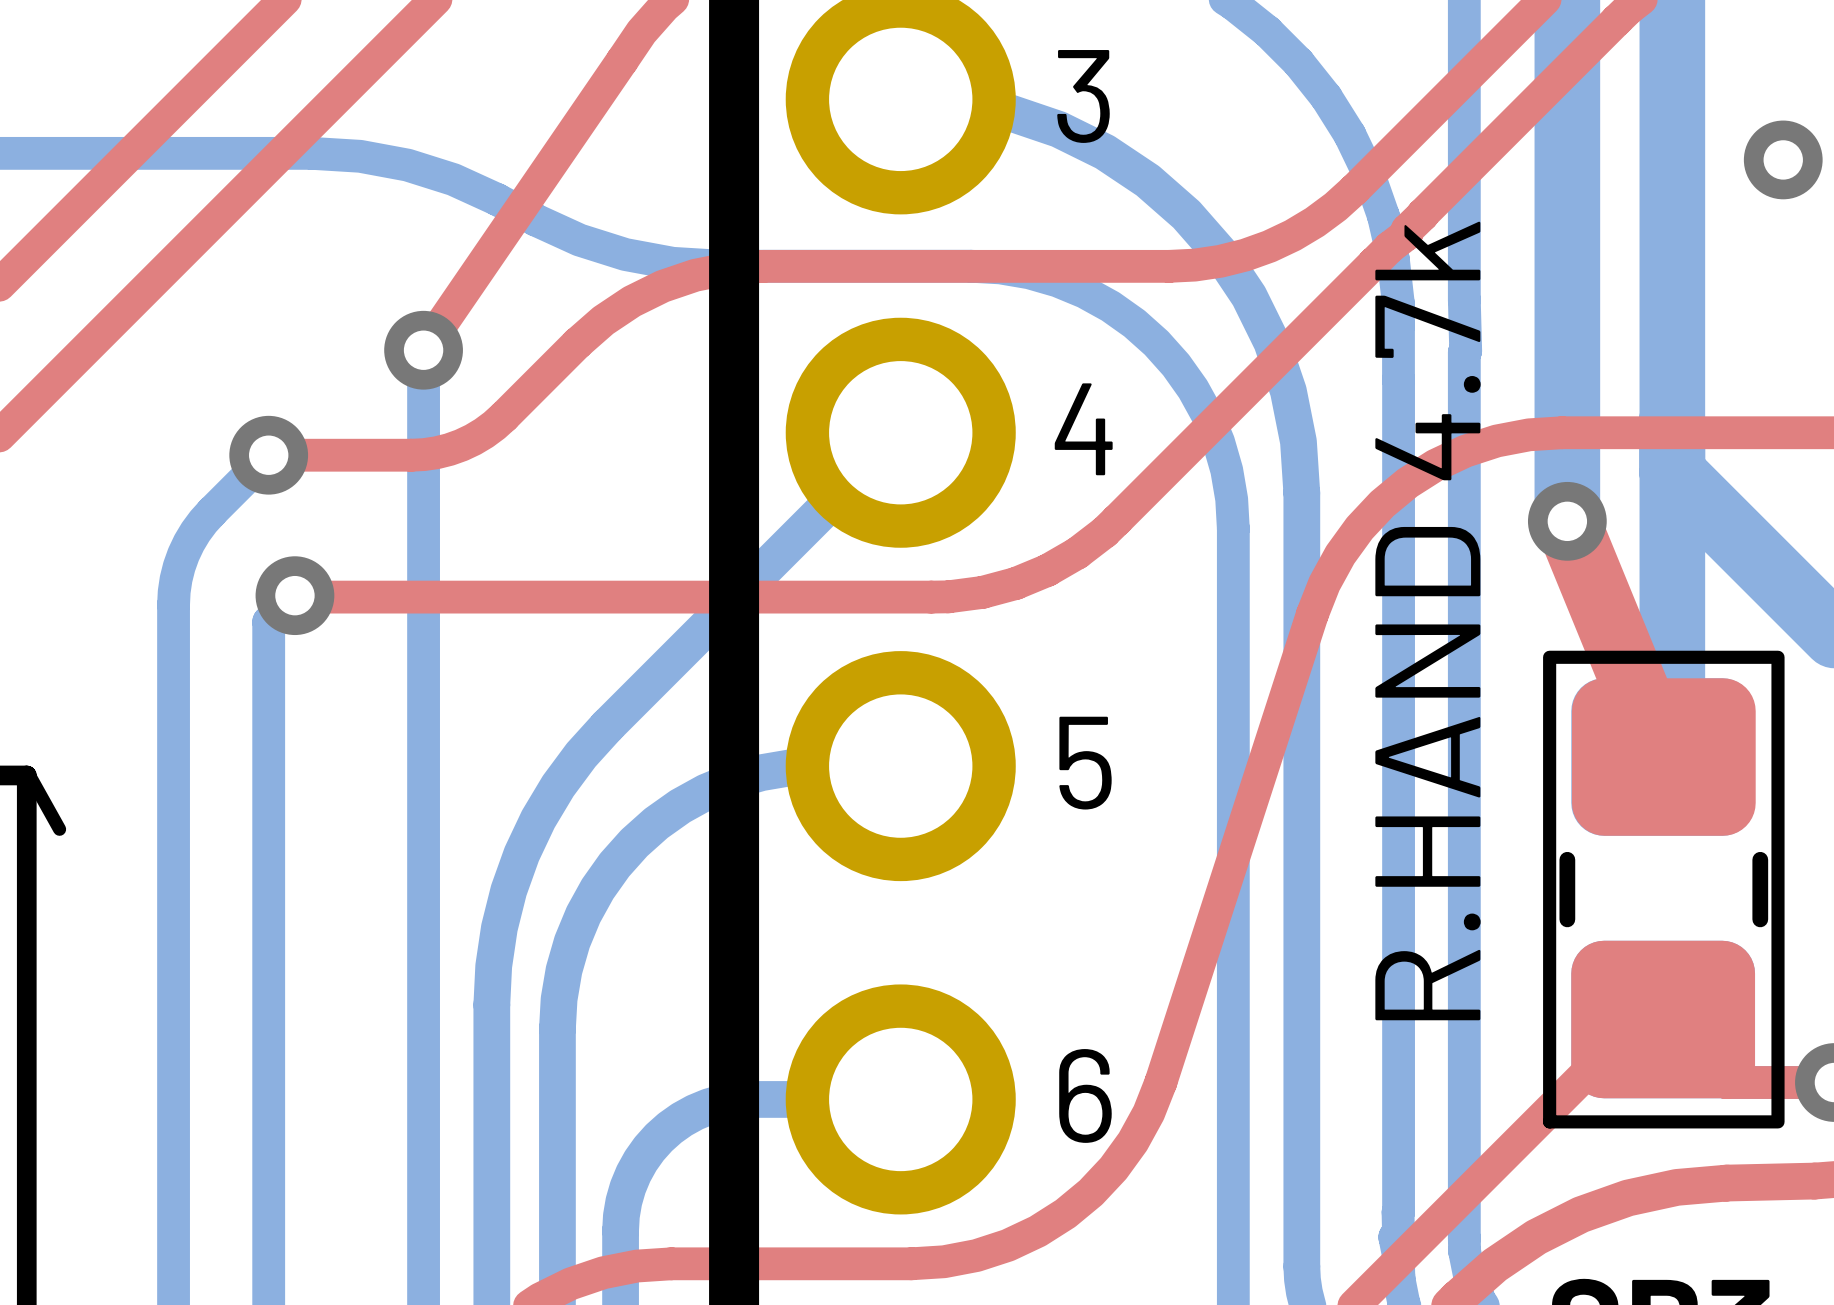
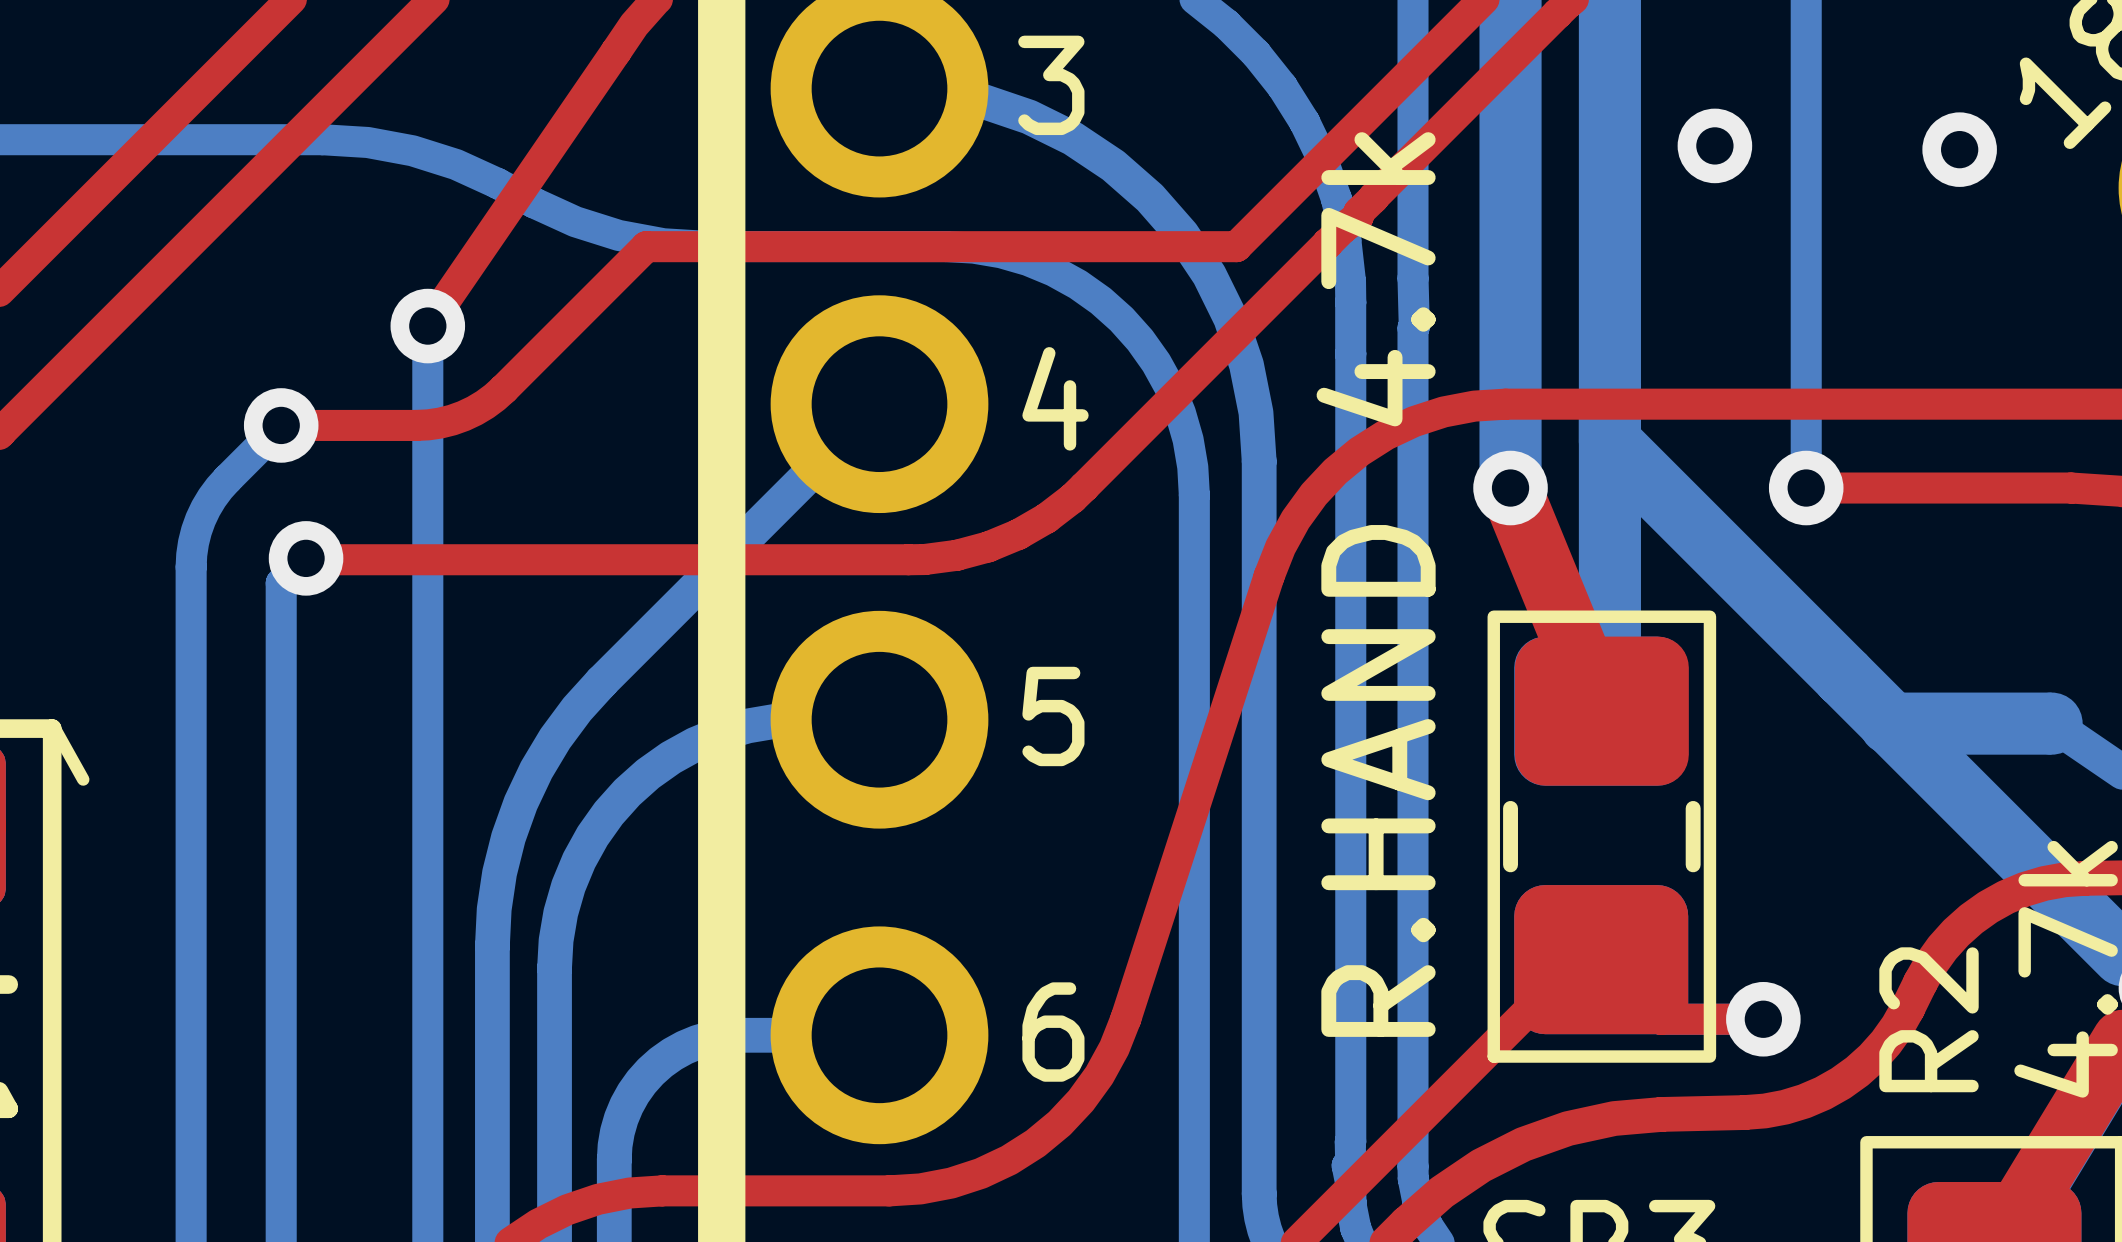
top track: (1354, 189) (1314, 222) (1269, 246) (1220, 261) (1169, 266) -> (1309, 173) (1236, 246) (1133, 246)
top track: (763, 266) (728, 268) (695, 275) (662, 286) (631, 301) (603, 320) (577, 343) -> (749, 246) (646, 246) (573, 319)

